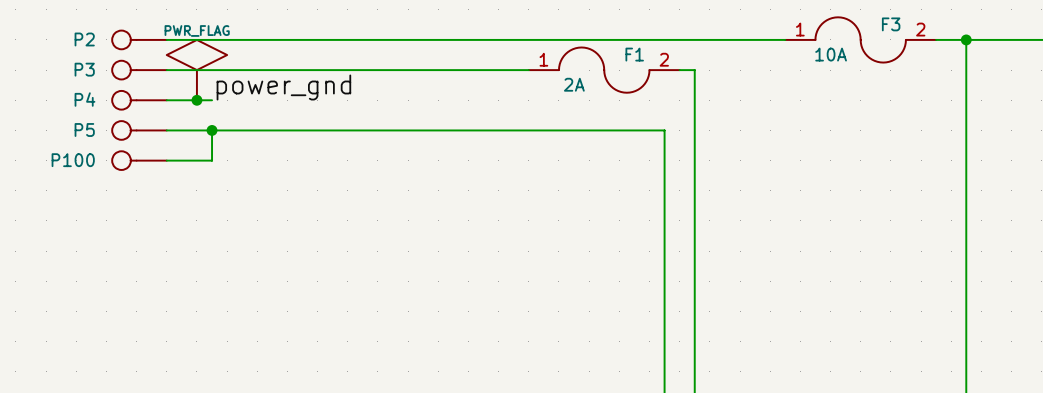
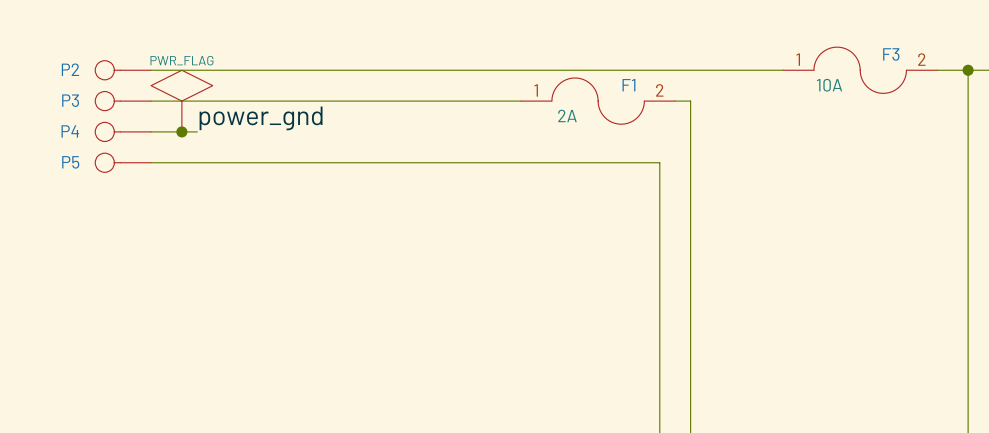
wire: (212, 130) (212, 160) (166, 160) -> none
junction: (212, 130) -> none
P100: (139, 160) -> none

